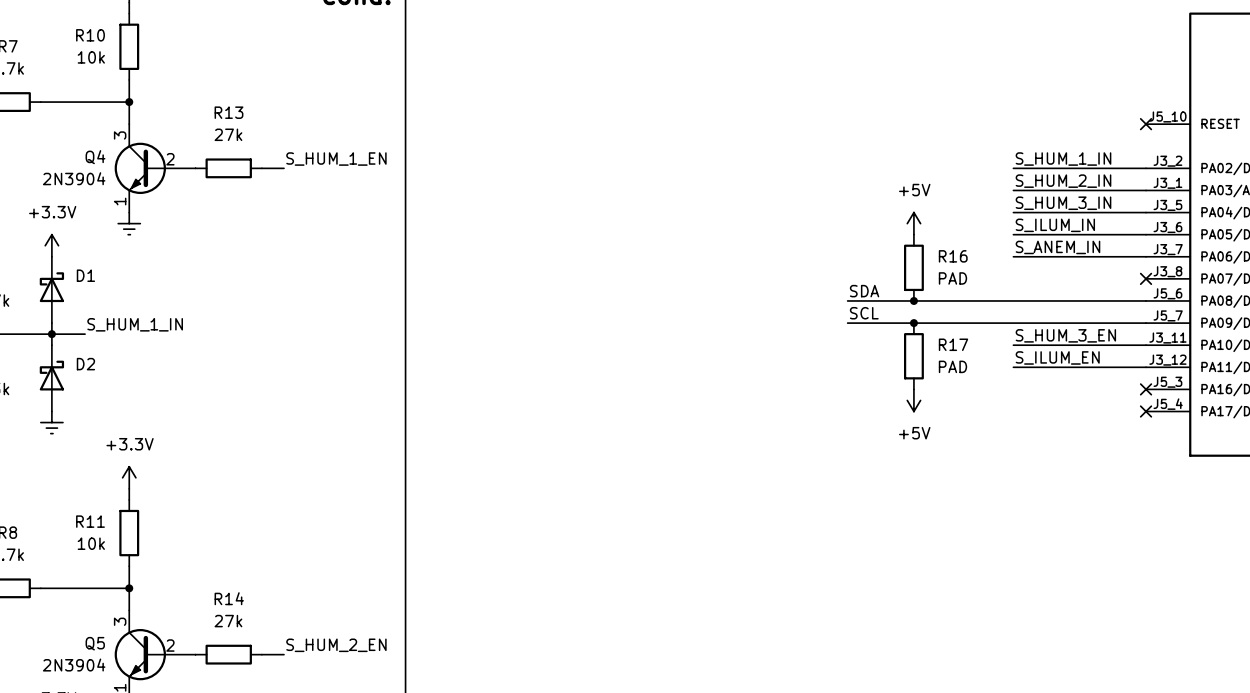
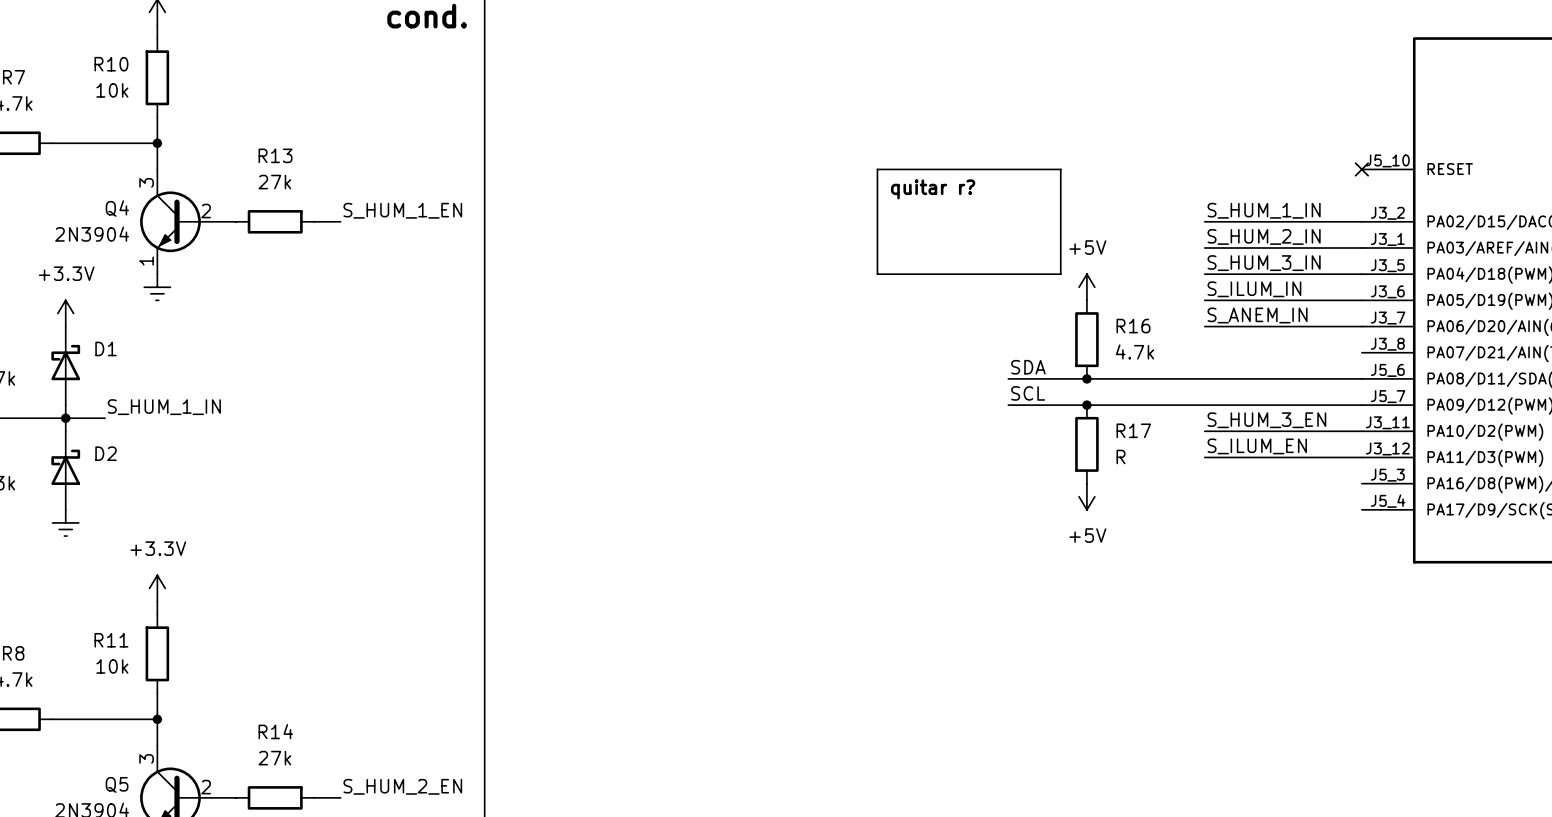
line: none -> (877, 169) (1060, 169) (1060, 274) (877, 274) (877, 169)
text: none -> quitar r? (933, 189)
R16 value: PAD (952, 278) -> 4.7k (1135, 351)
no-connect mark: (1146, 278) -> none
R17 value: PAD (952, 366) -> R (1121, 456)
no-connect mark: (1146, 389) -> none
no-connect mark: (1146, 411) -> none

